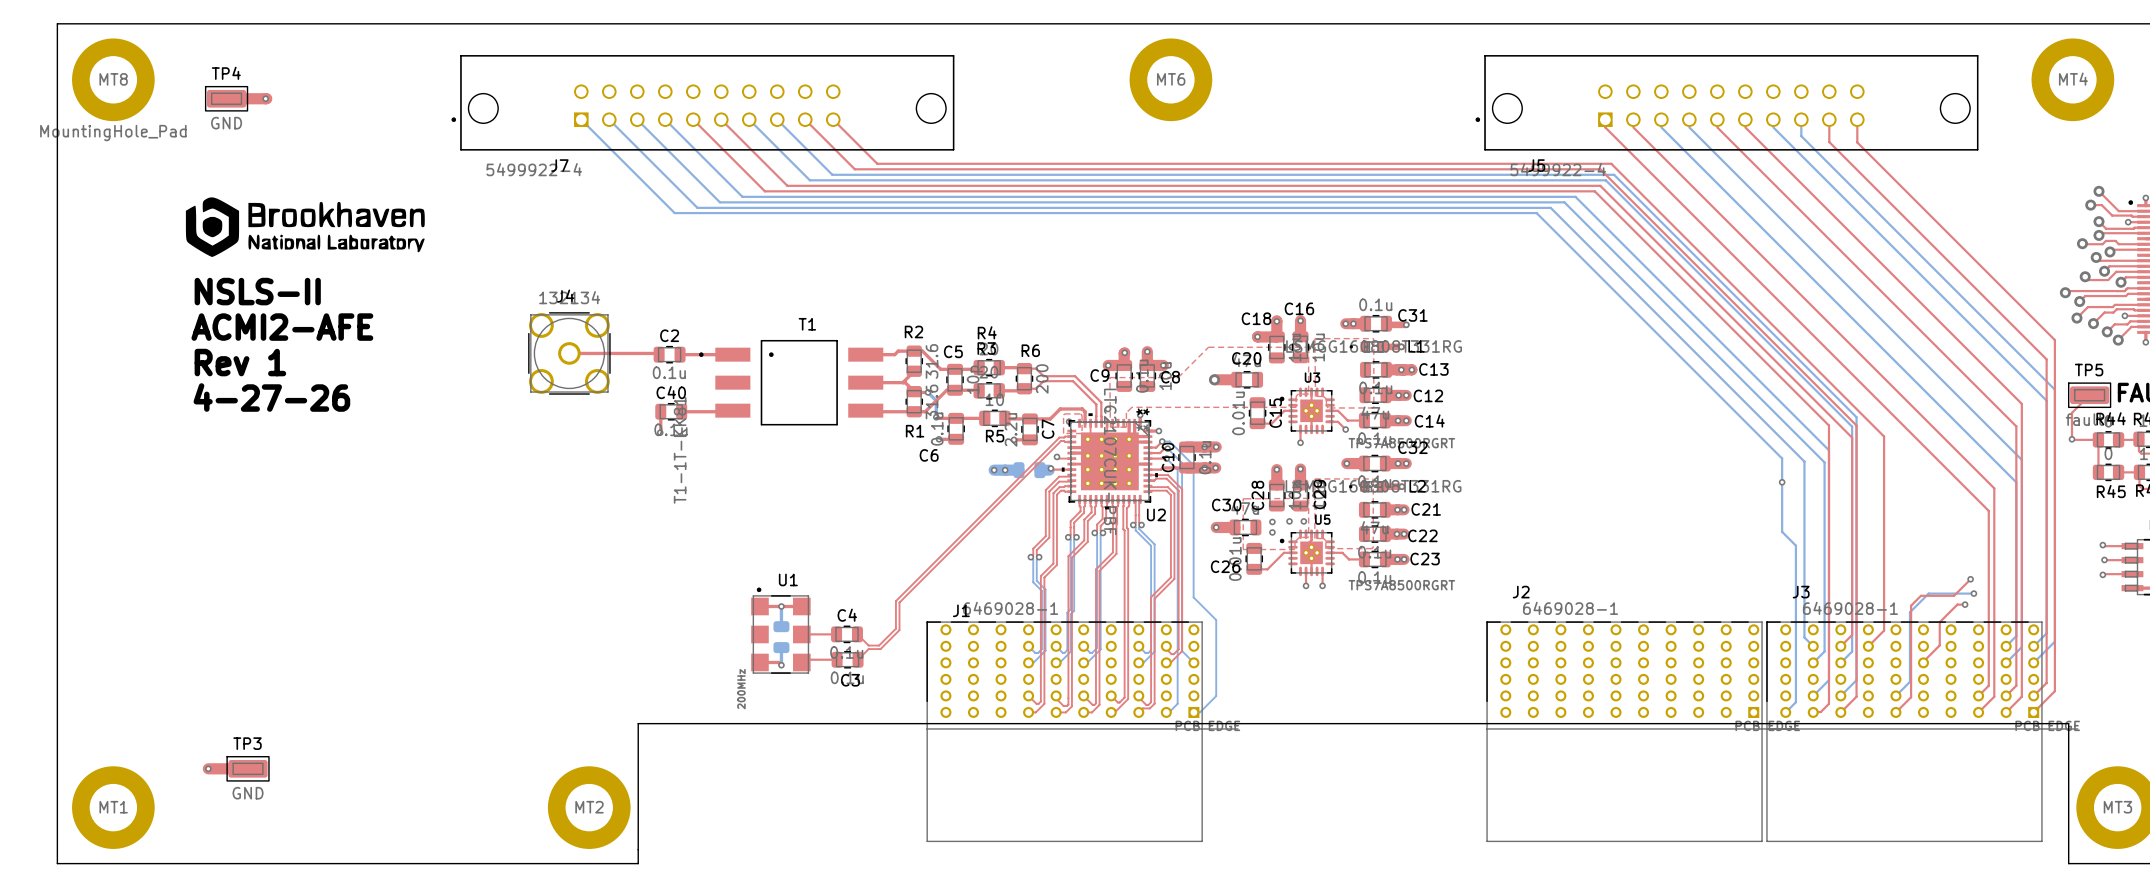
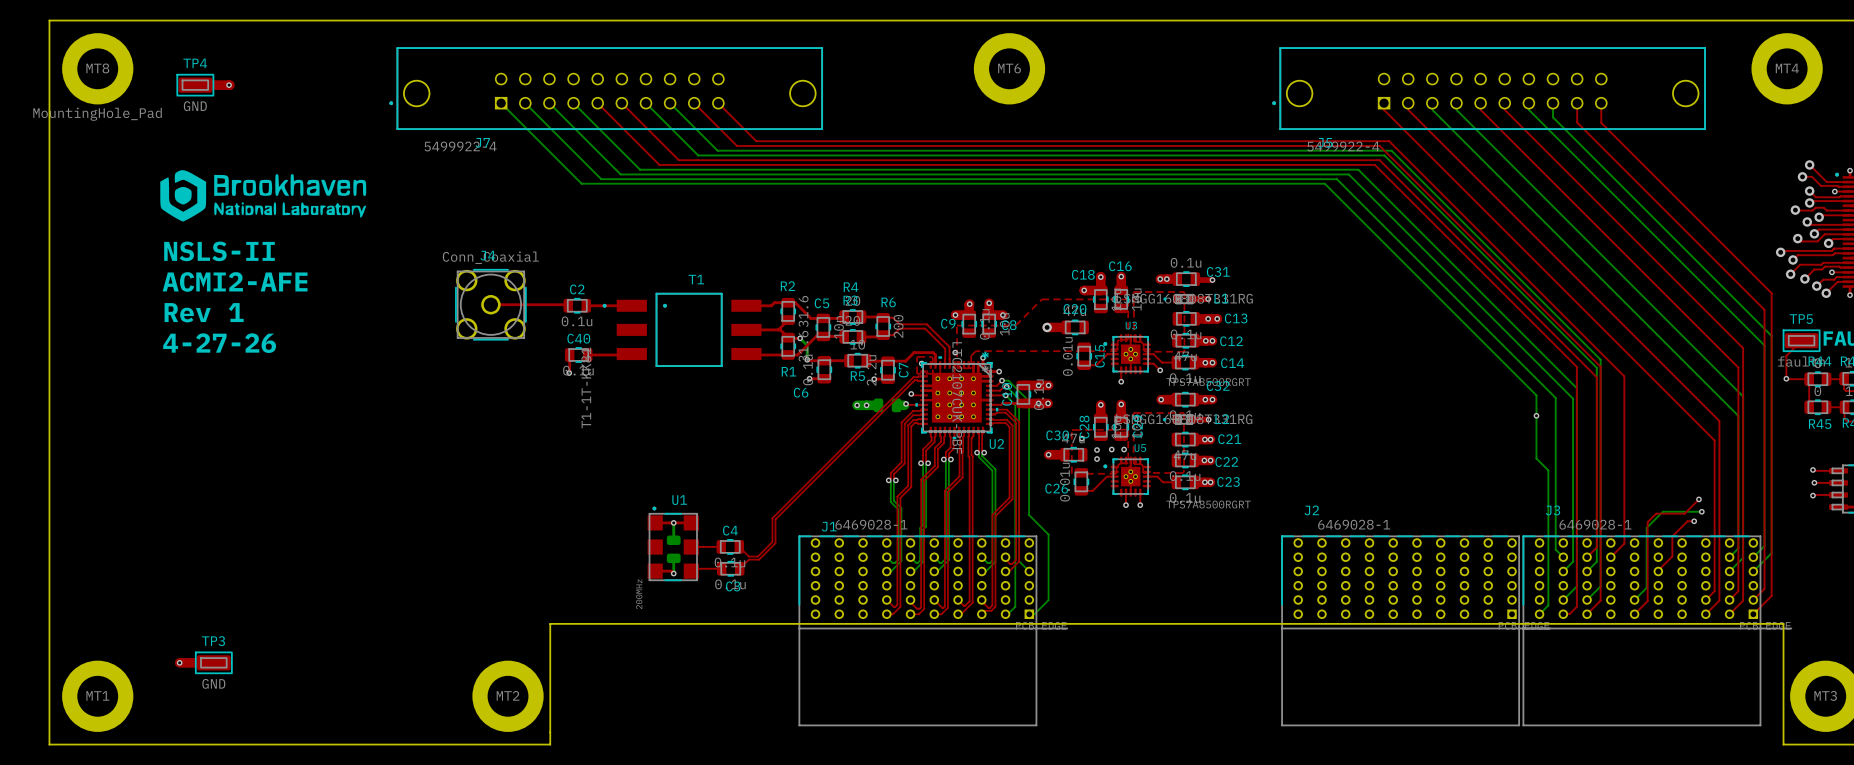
J4 value: 132134 (569, 297) -> Conn_Coaxial (490, 257)

